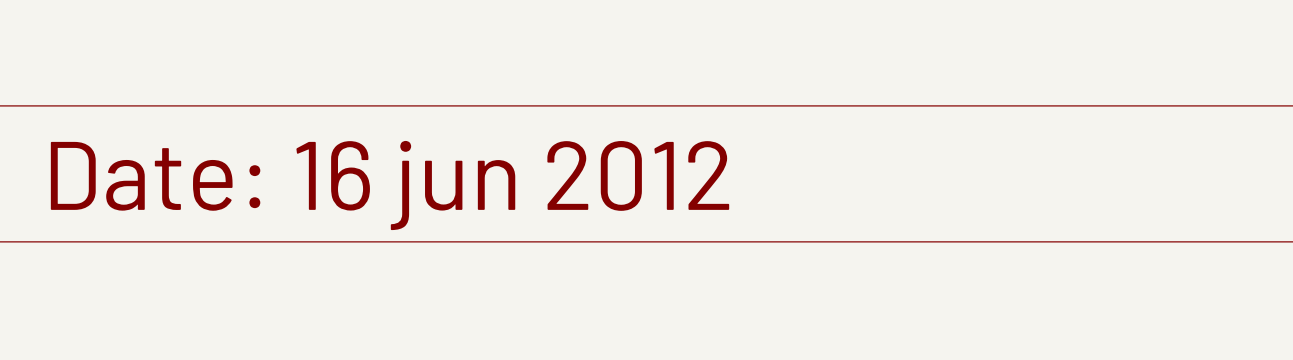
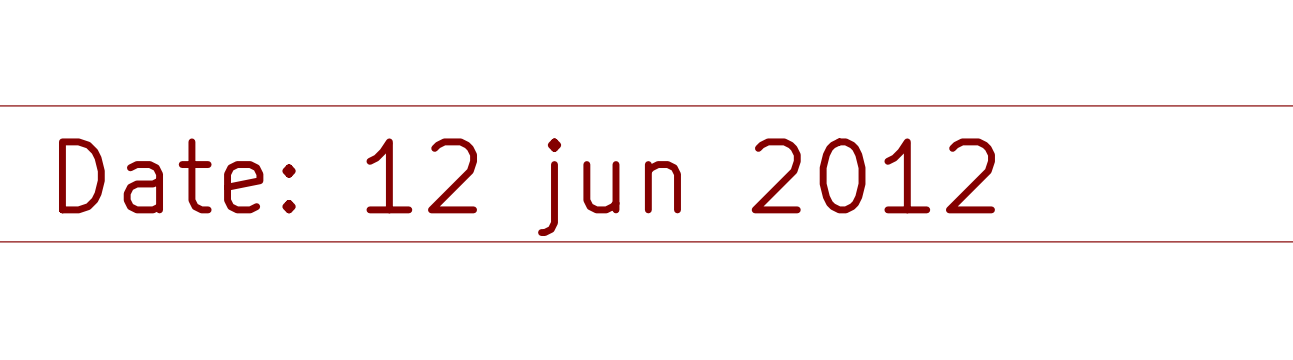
title block: Date: 16 jun 2012 (390, 185) -> Date: 12 jun 2012 (526, 187)

